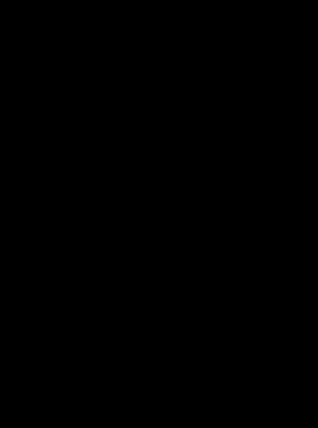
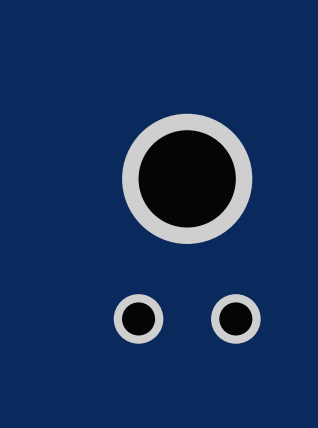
part: none -> (187, 228)

